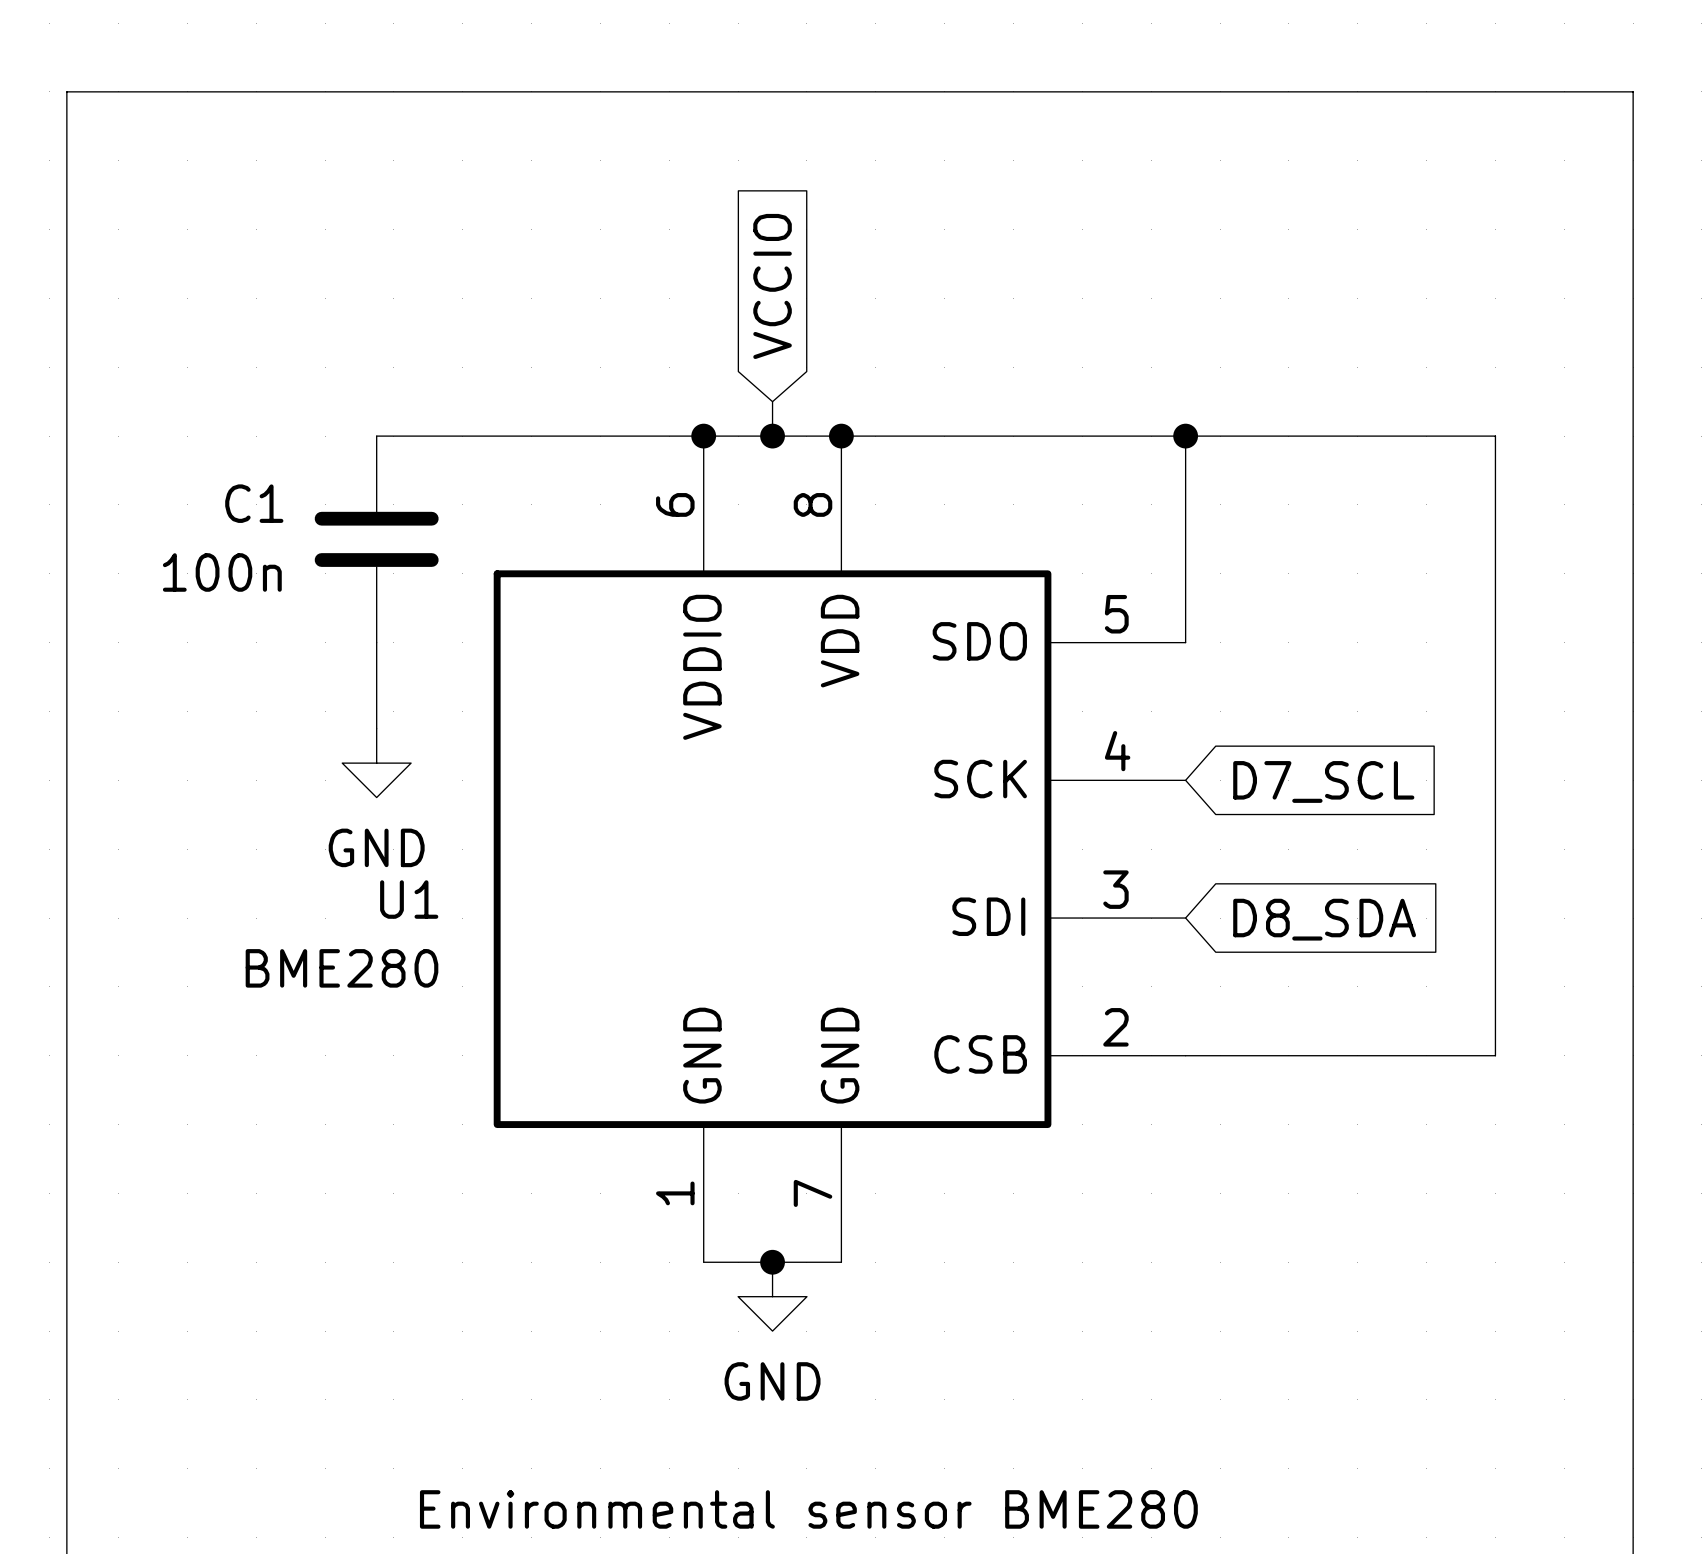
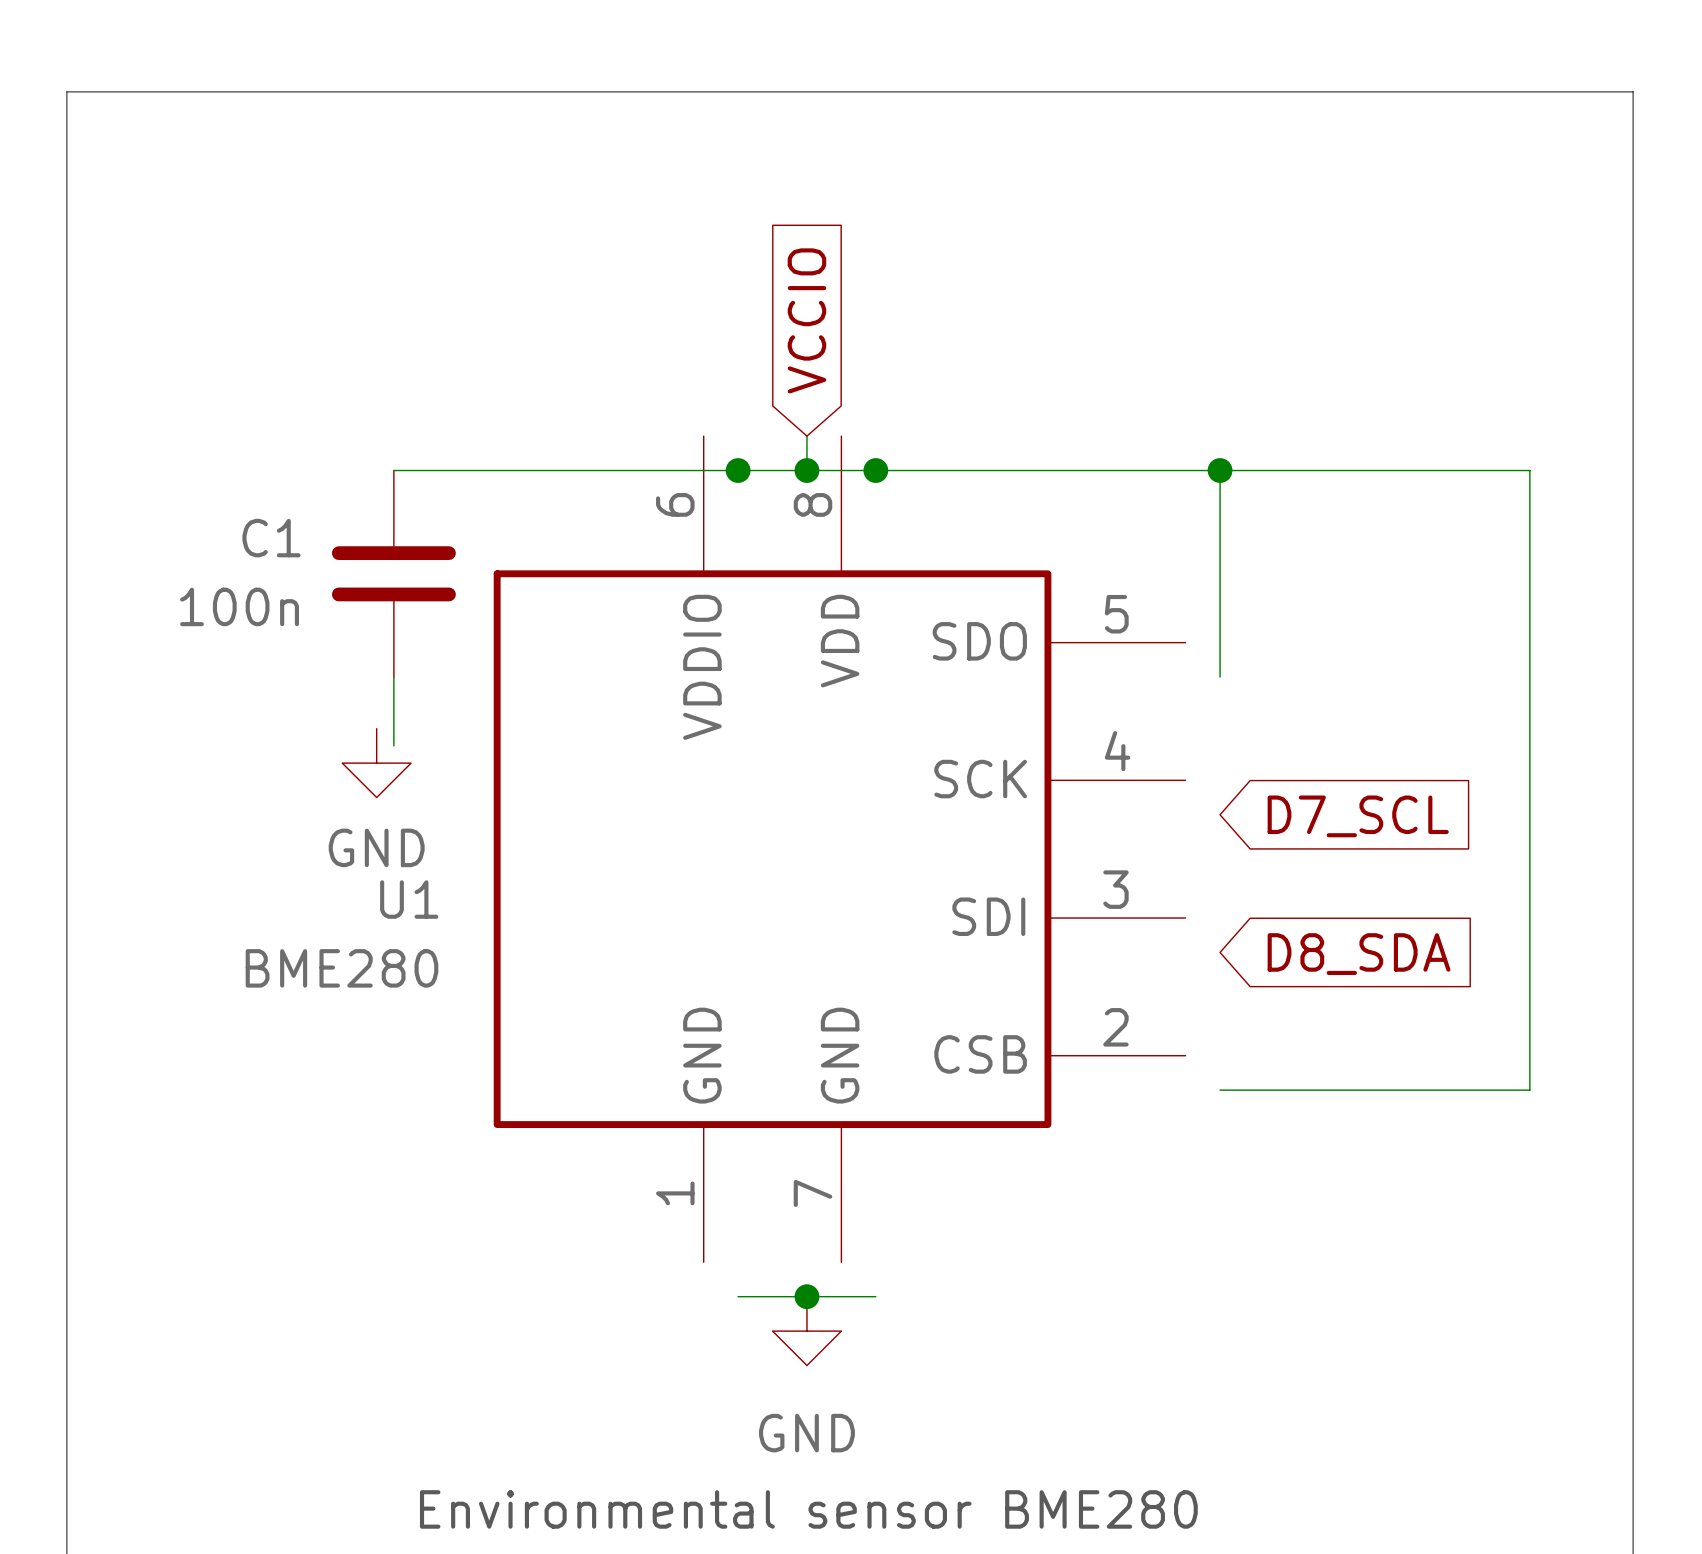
global label position: VCCIO (772, 286) -> VCCIO (806, 320)
wire: (772, 401) (772, 436) -> (806, 436) (806, 470)
wire: (376, 436) (1495, 436) (1495, 1055) (1185, 1055) -> none
junction: (703, 436) -> none
junction: (772, 436) -> none
junction: (841, 436) -> none
wire: (1185, 436) (1185, 642) -> (1220, 470) (1220, 677)
junction position: (1185, 436) -> (1220, 470)
wire: none -> (393, 470) (1529, 470) (1529, 1090) (1220, 1090)
junction: none -> (738, 470)
junction: none -> (806, 470)
junction: none -> (875, 470)
C1 position: (376, 539) -> (393, 573)
wire: (376, 642) (376, 728) -> none
wire: none -> (393, 677) (393, 745)
global label position: D7_SCL (1323, 781) -> D7_SCL (1358, 816)
global label position: D8_SDA (1324, 919) -> D8_SDA (1359, 954)
wire: (703, 1262) (841, 1262) -> (738, 1296) (875, 1296)
junction position: (772, 1262) -> (806, 1296)
power symbol position: GND (772, 1296) -> GND (806, 1331)
power symbol text position: GND (772, 1381) -> GND (806, 1433)

